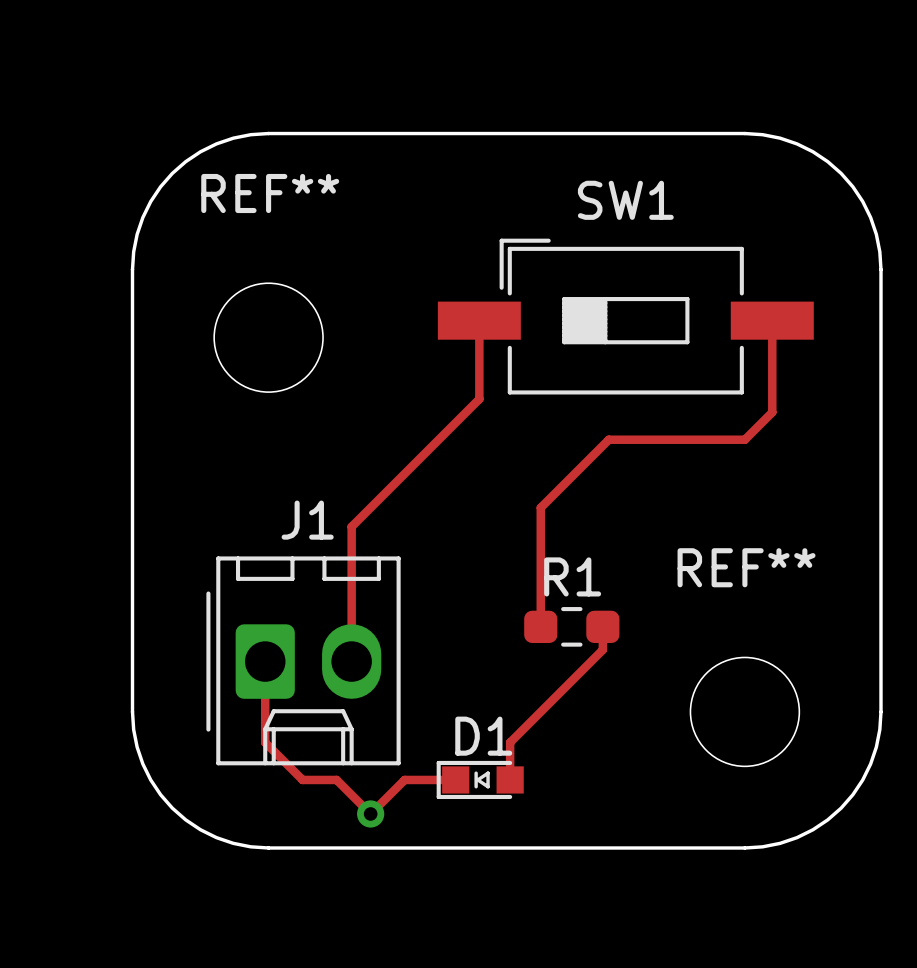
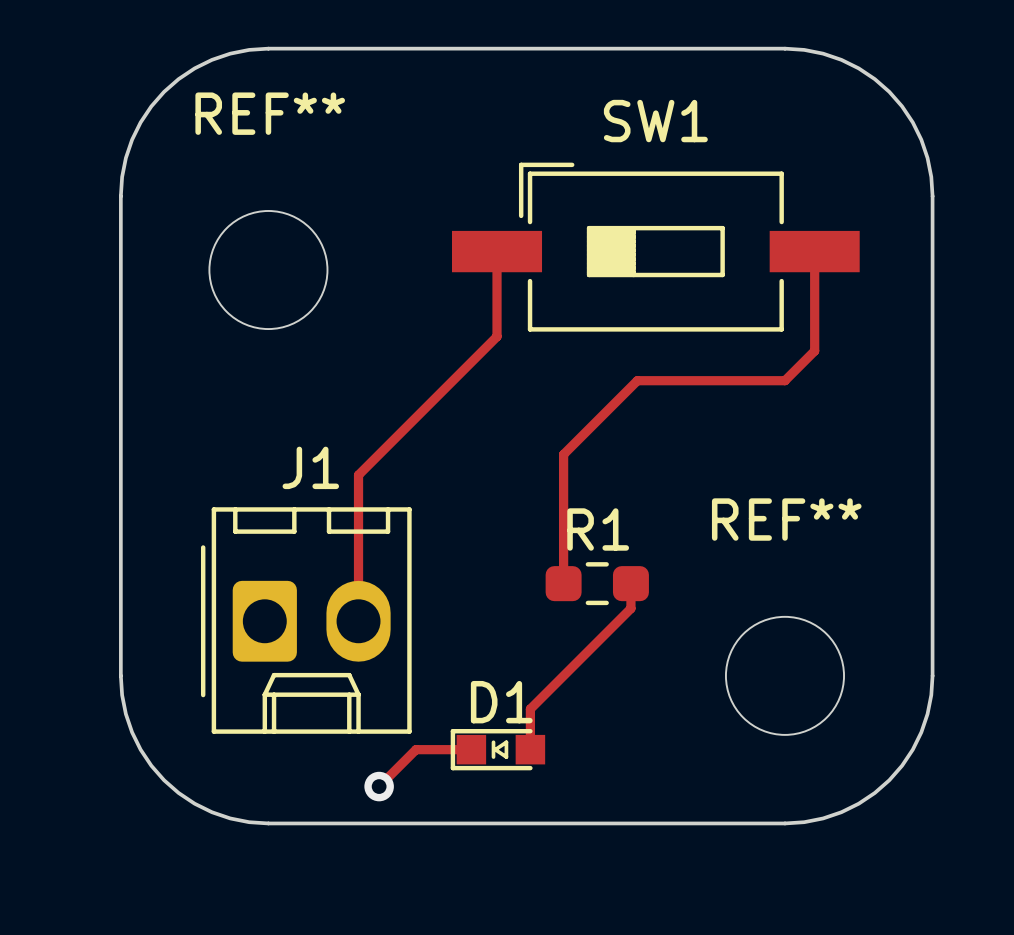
track: (265, 661) (265, 742) (302, 779) (336, 779) (370, 813) -> none

